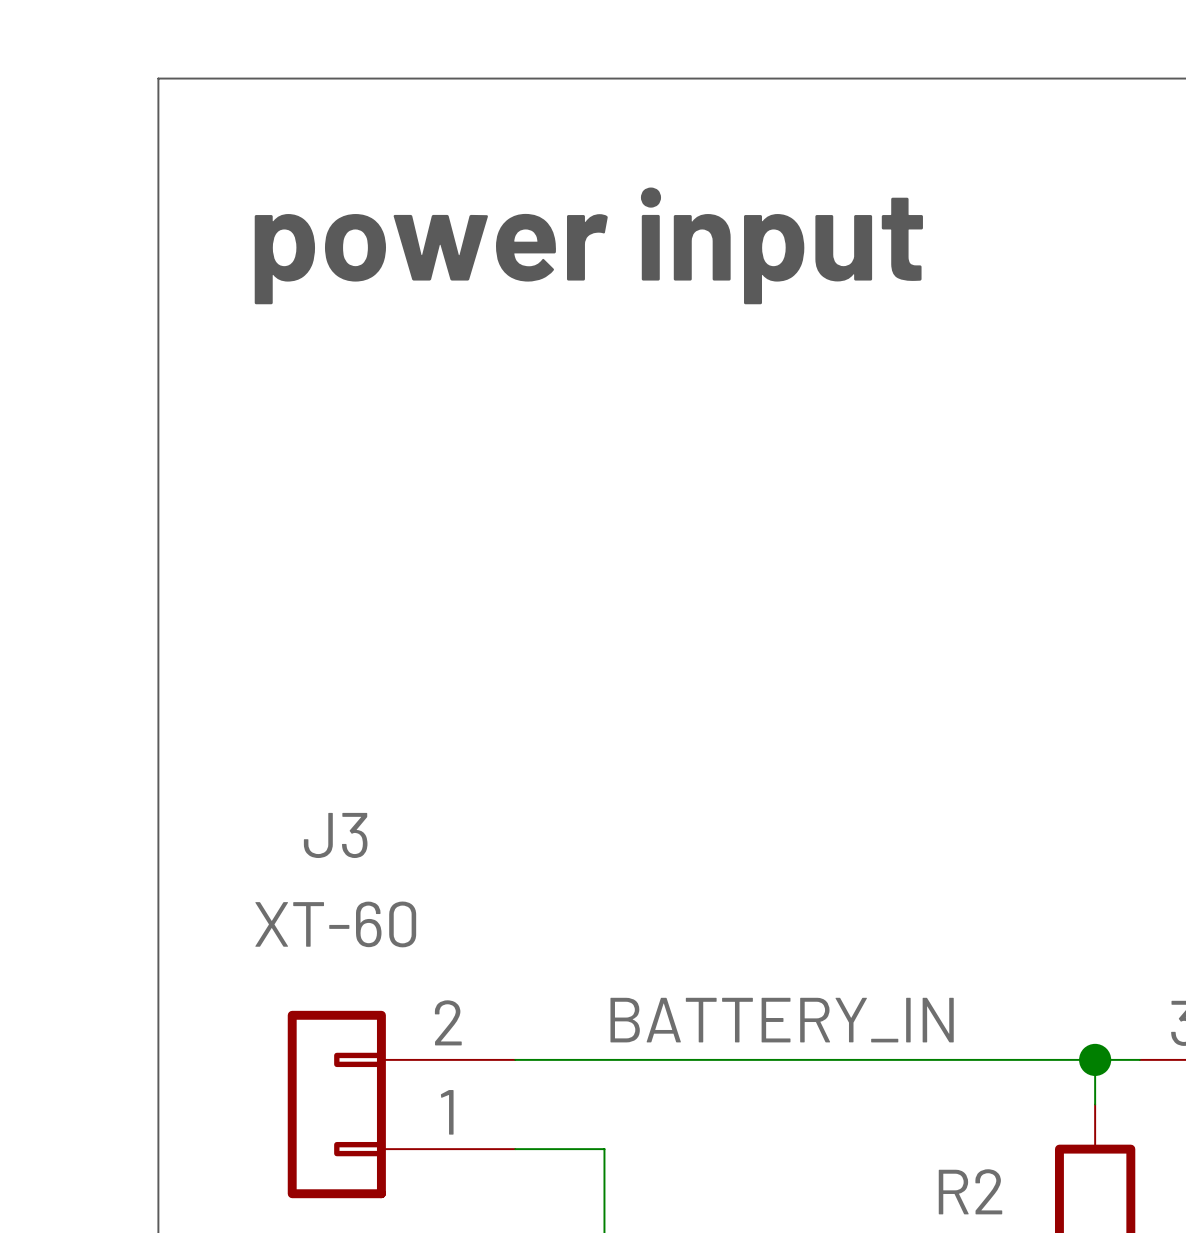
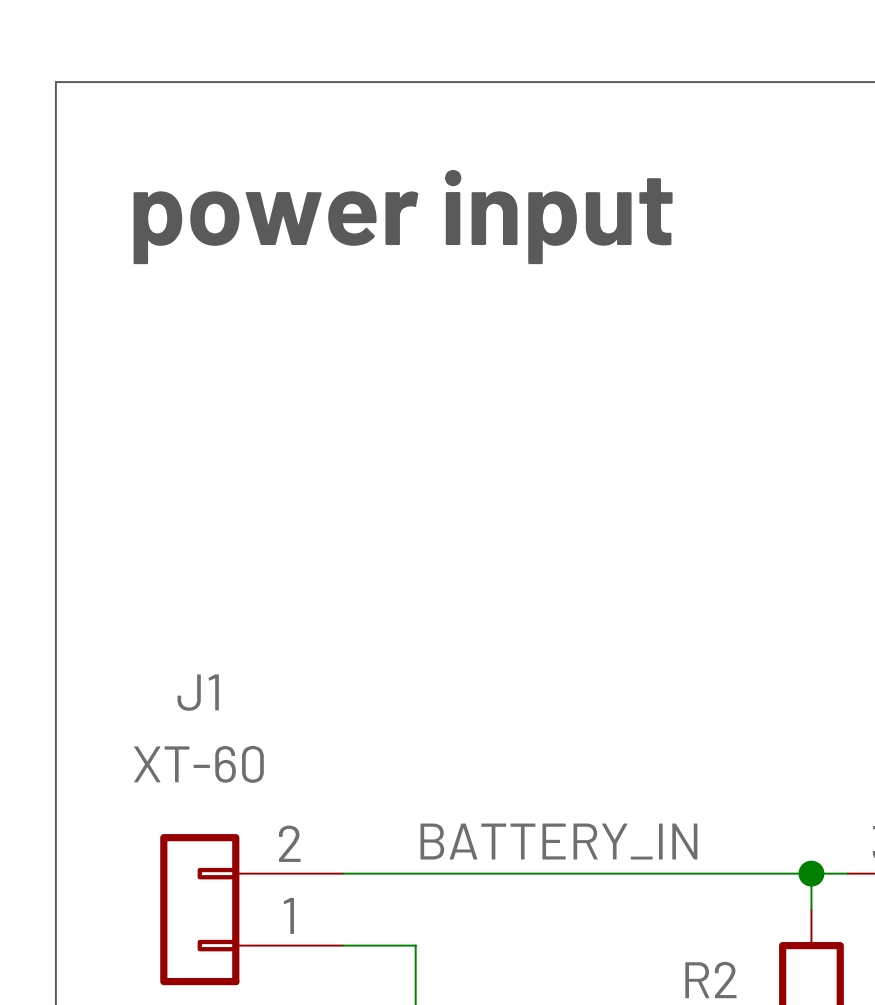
J3 name: J3 (335, 835) -> J1 (198, 692)

